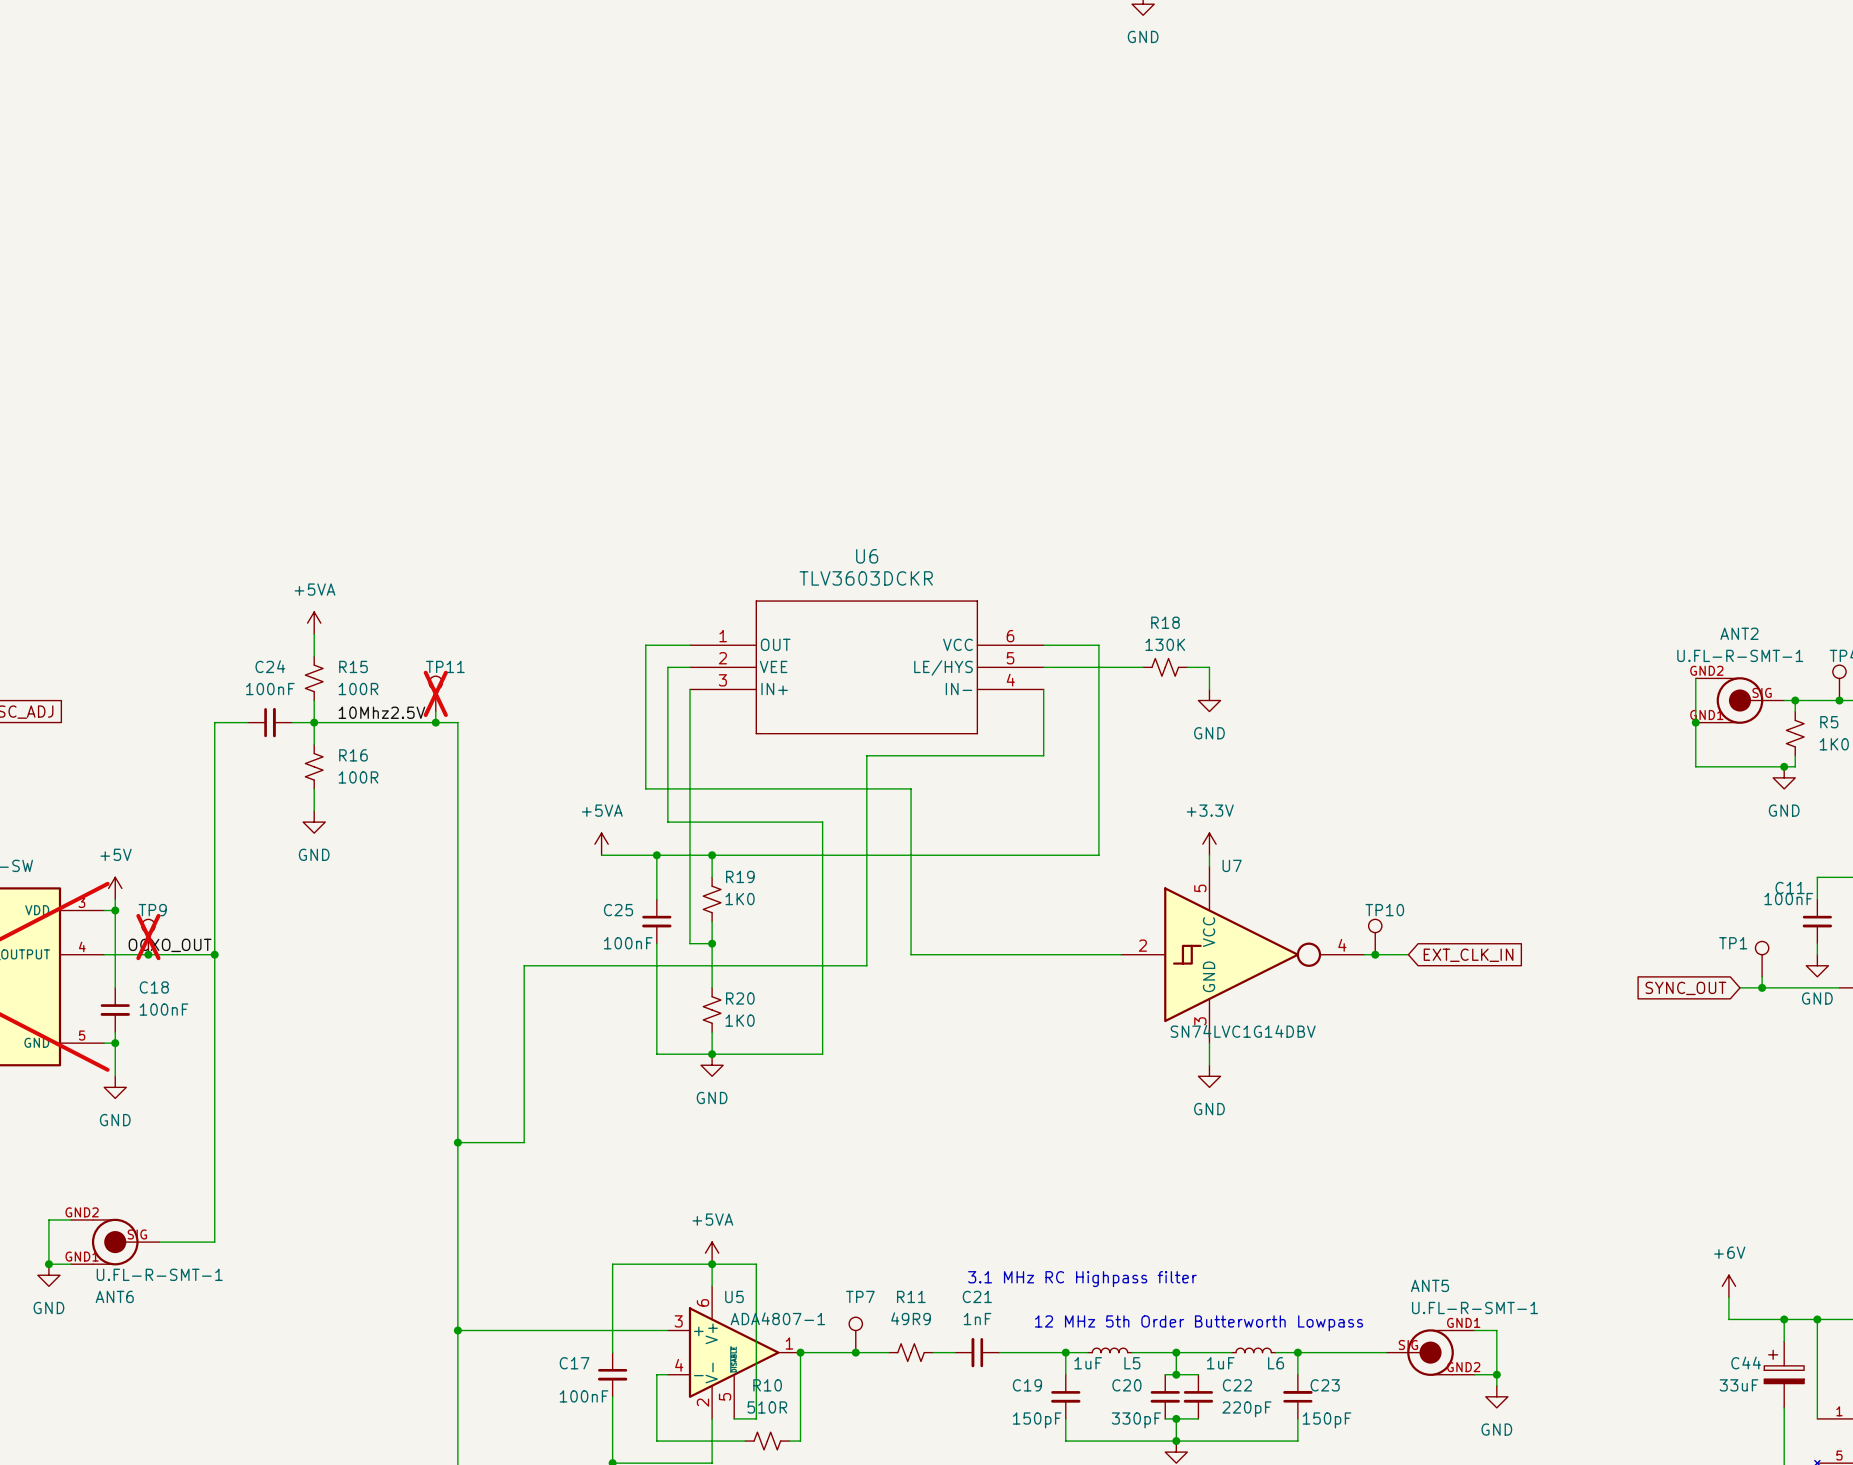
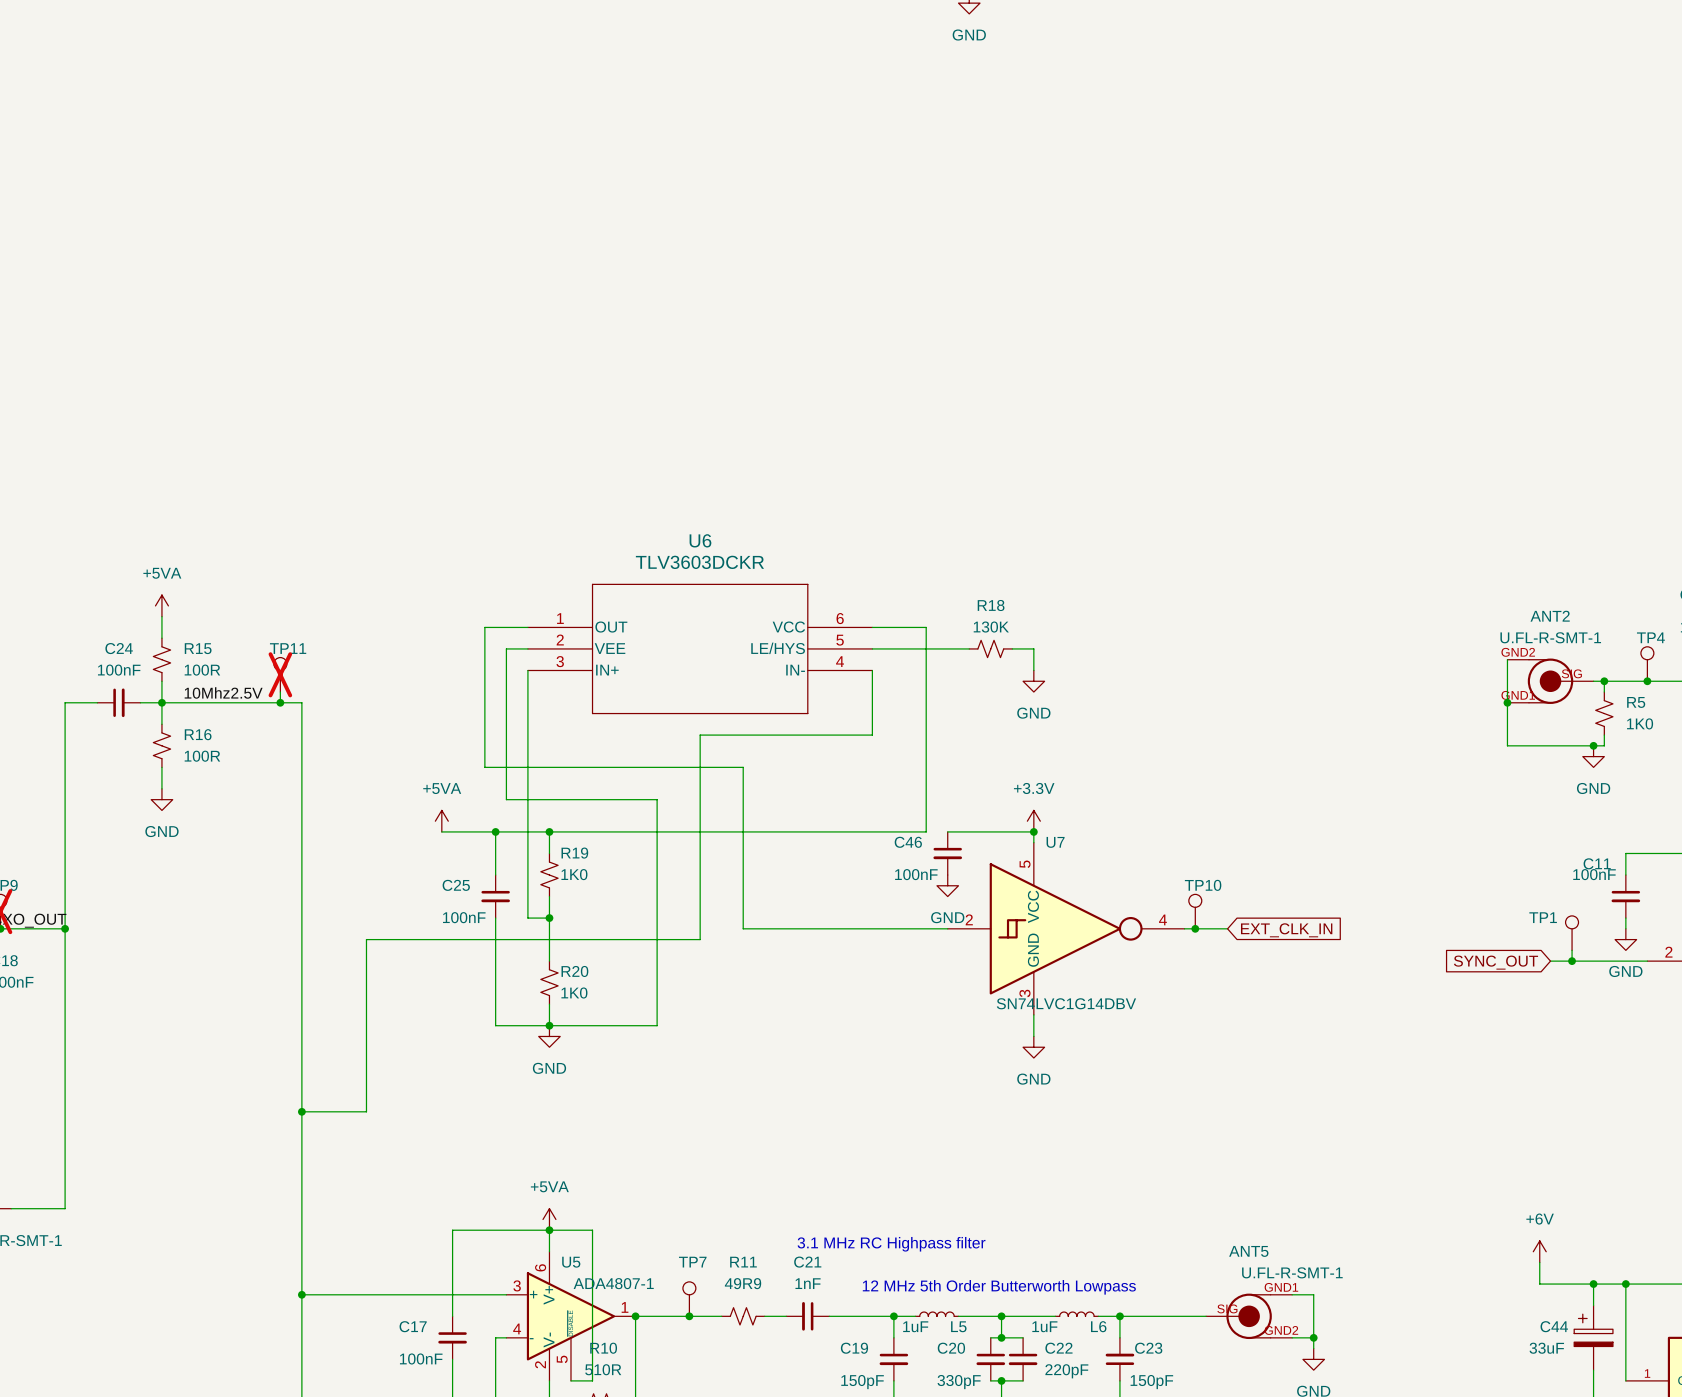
wire: none -> (947, 831) (1033, 831)
junction: none -> (1033, 831)
C46: none -> 100nF (947, 853)
power symbol: none -> GND (947, 885)

